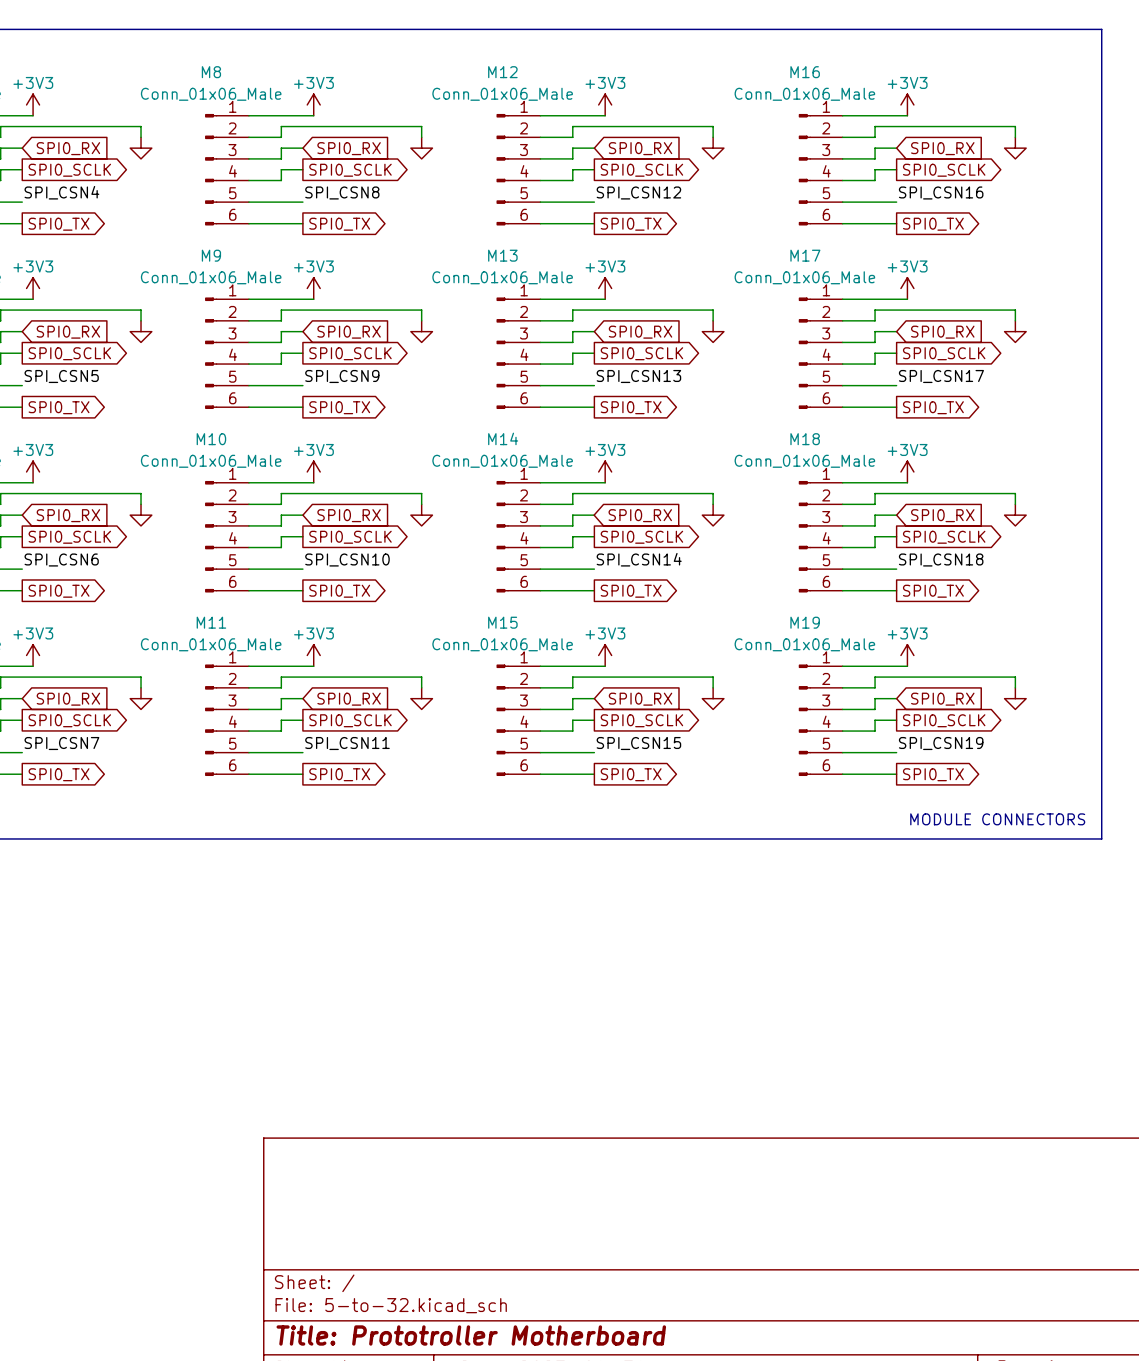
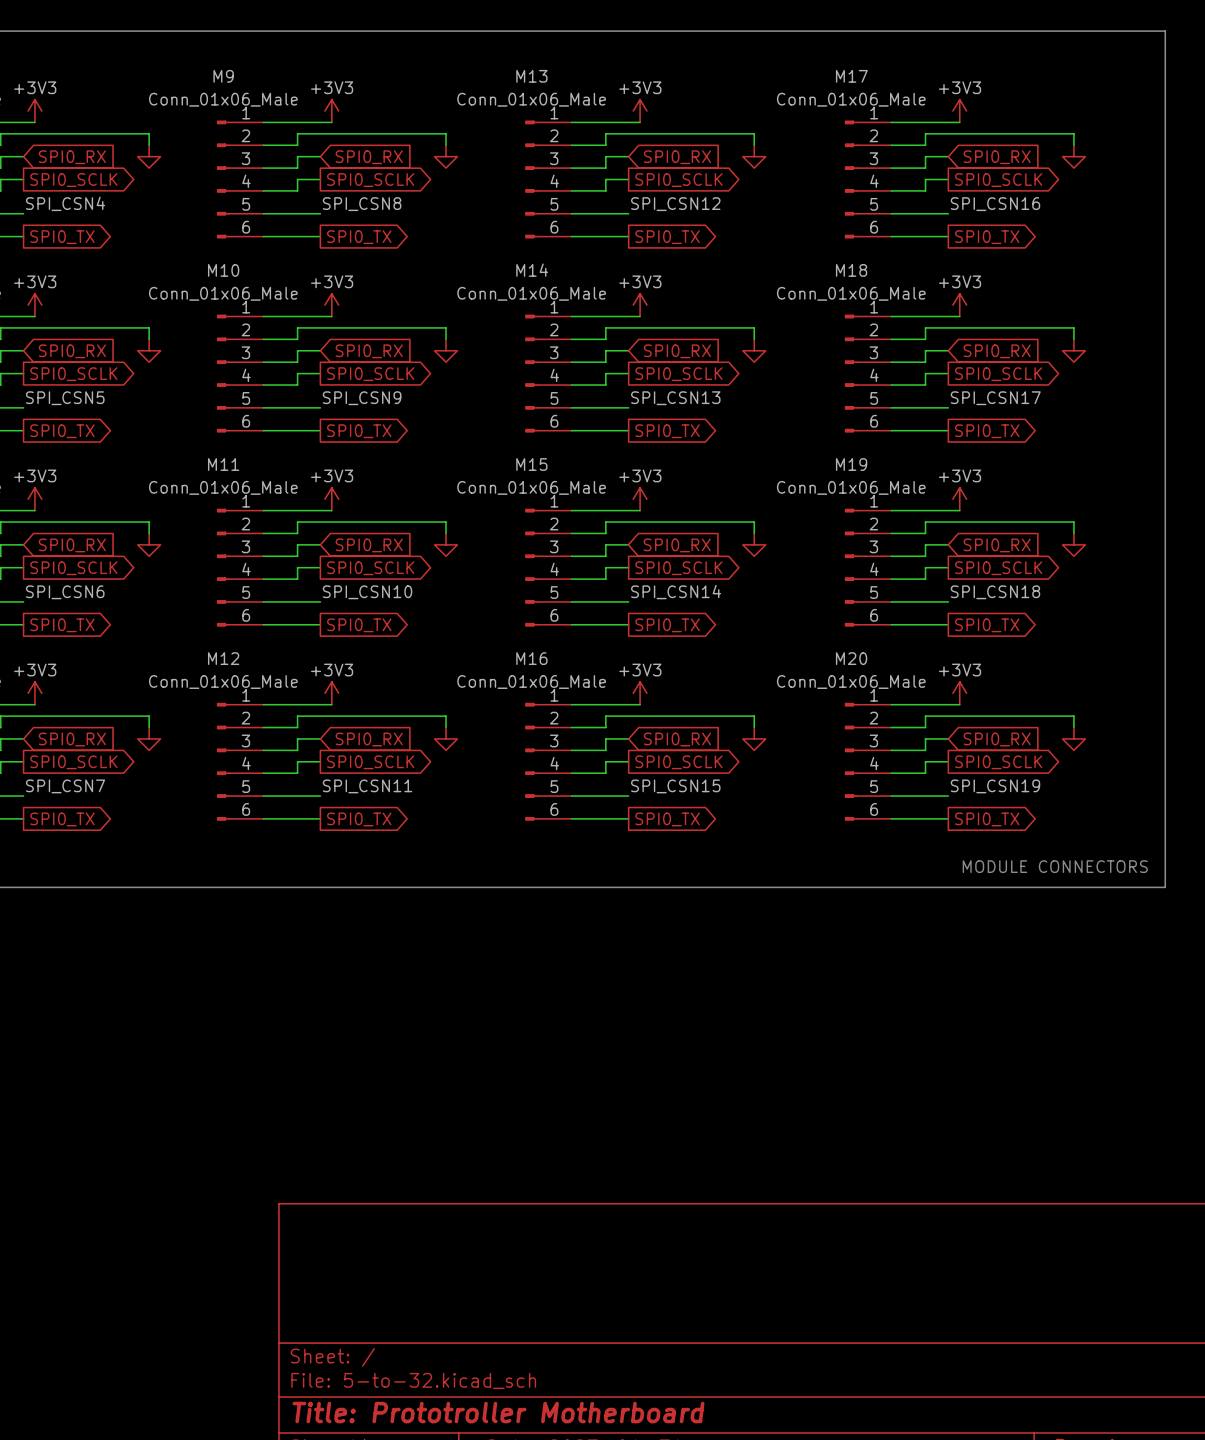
M8 name: M8 (211, 72) -> M9 (223, 76)
M12 name: M12 (502, 72) -> M13 (531, 76)
M16 name: M16 (805, 72) -> M17 (851, 76)
M9 name: M9 (211, 255) -> M10 (223, 270)
M13 name: M13 (502, 255) -> M14 (532, 270)
M17 name: M17 (805, 255) -> M18 (851, 270)
M14 name: M14 (503, 438) -> M15 (531, 464)
M10 name: M10 (211, 439) -> M11 (223, 464)
M18 name: M18 (805, 439) -> M19 (851, 464)
M11 name: M11 (211, 622) -> M12 (223, 658)
M15 name: M15 (502, 622) -> M16 (531, 658)
M19 name: M19 (805, 622) -> M20 (851, 658)

